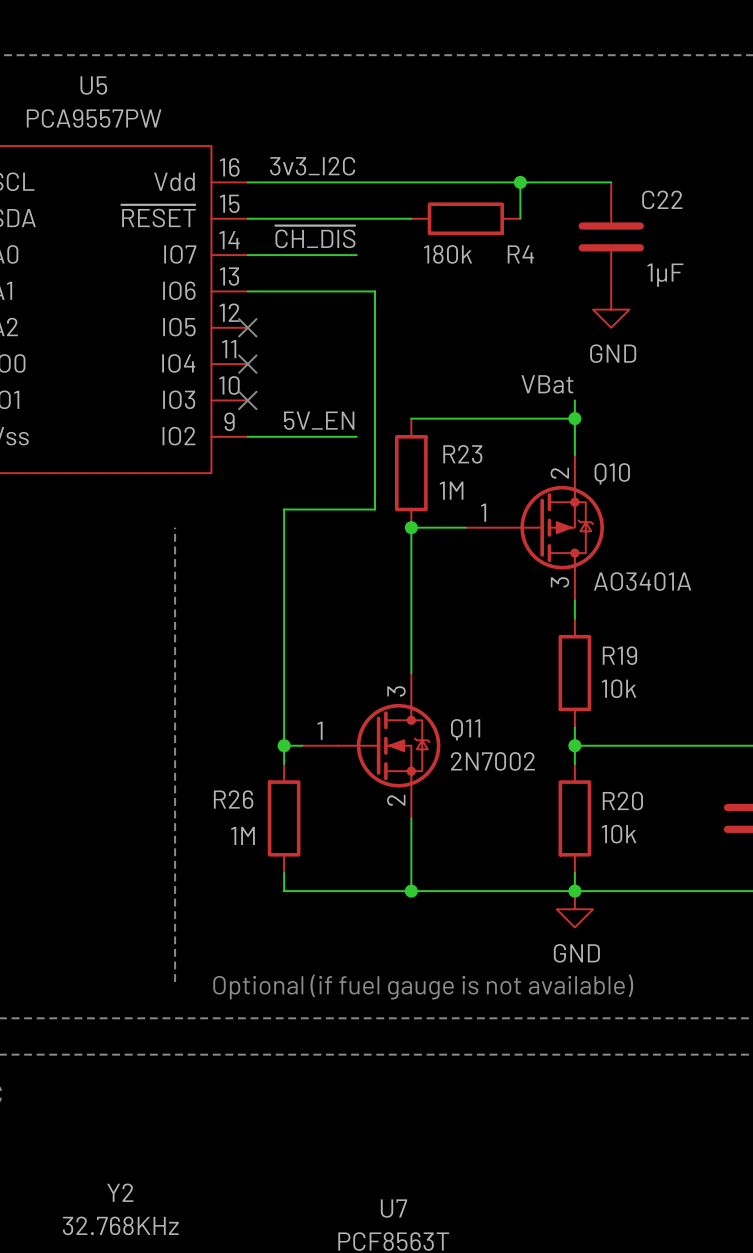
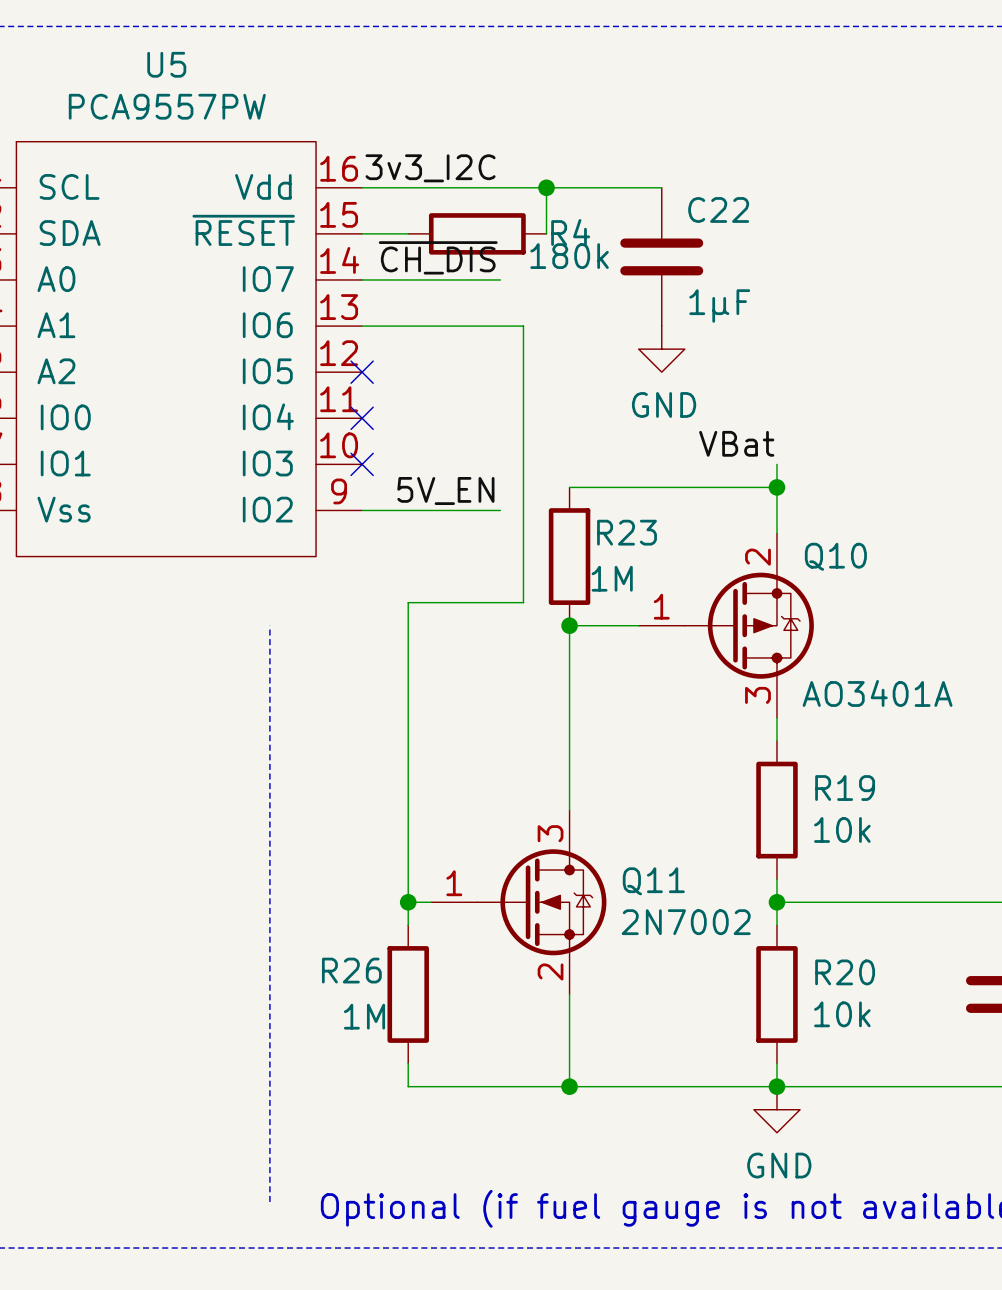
junction: none -> (546, 187)
wire: (484, 182) (611, 182) -> none
wire: (520, 182) (520, 218) -> (546, 187) (546, 233)
junction: (520, 182) -> none
wire: (284, 218) (411, 218) -> none
R4 position: (465, 218) -> (477, 233)
C22 position: (611, 236) -> (661, 256)
R4 value position: 180k (448, 254) -> 180k (569, 256)
R4 name position: R4 (520, 254) -> R4 (570, 232)
power symbol position: GND (611, 309) -> GND (661, 349)

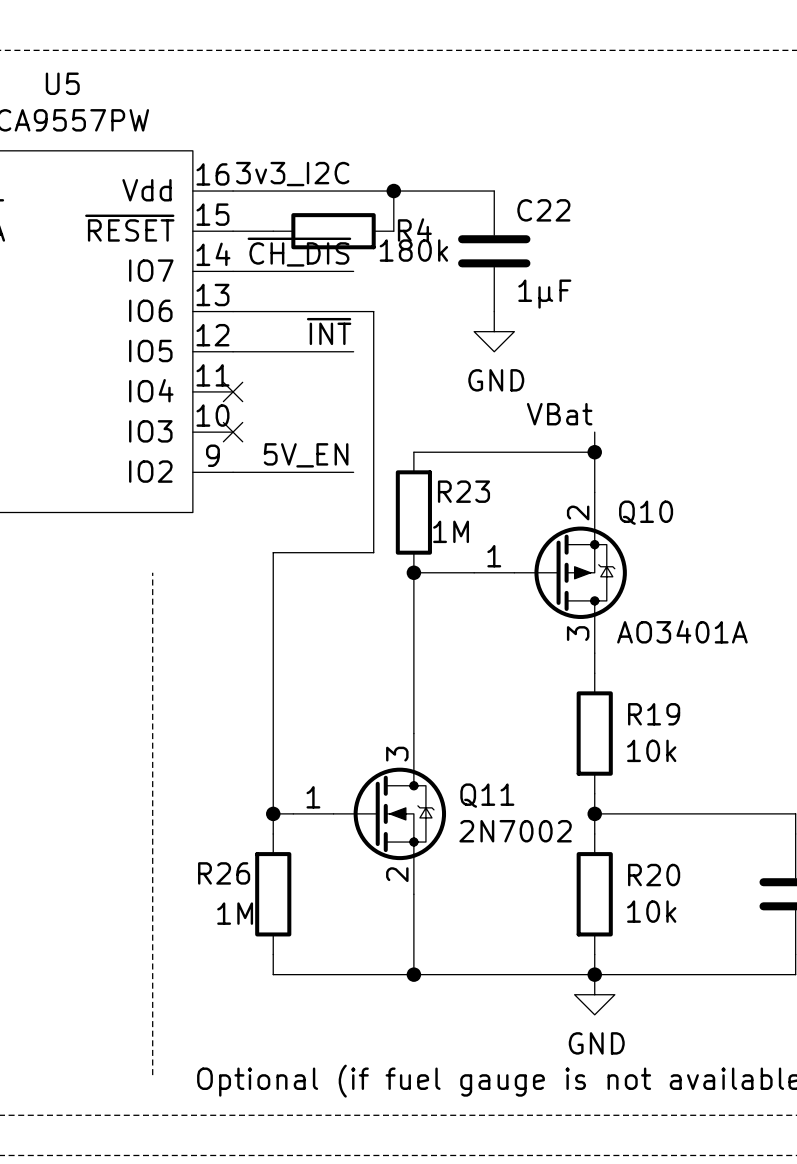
label: none -> ~{INT} (329, 331)
wire: none -> (233, 351) (353, 351)
no-connect mark: (362, 372) -> none

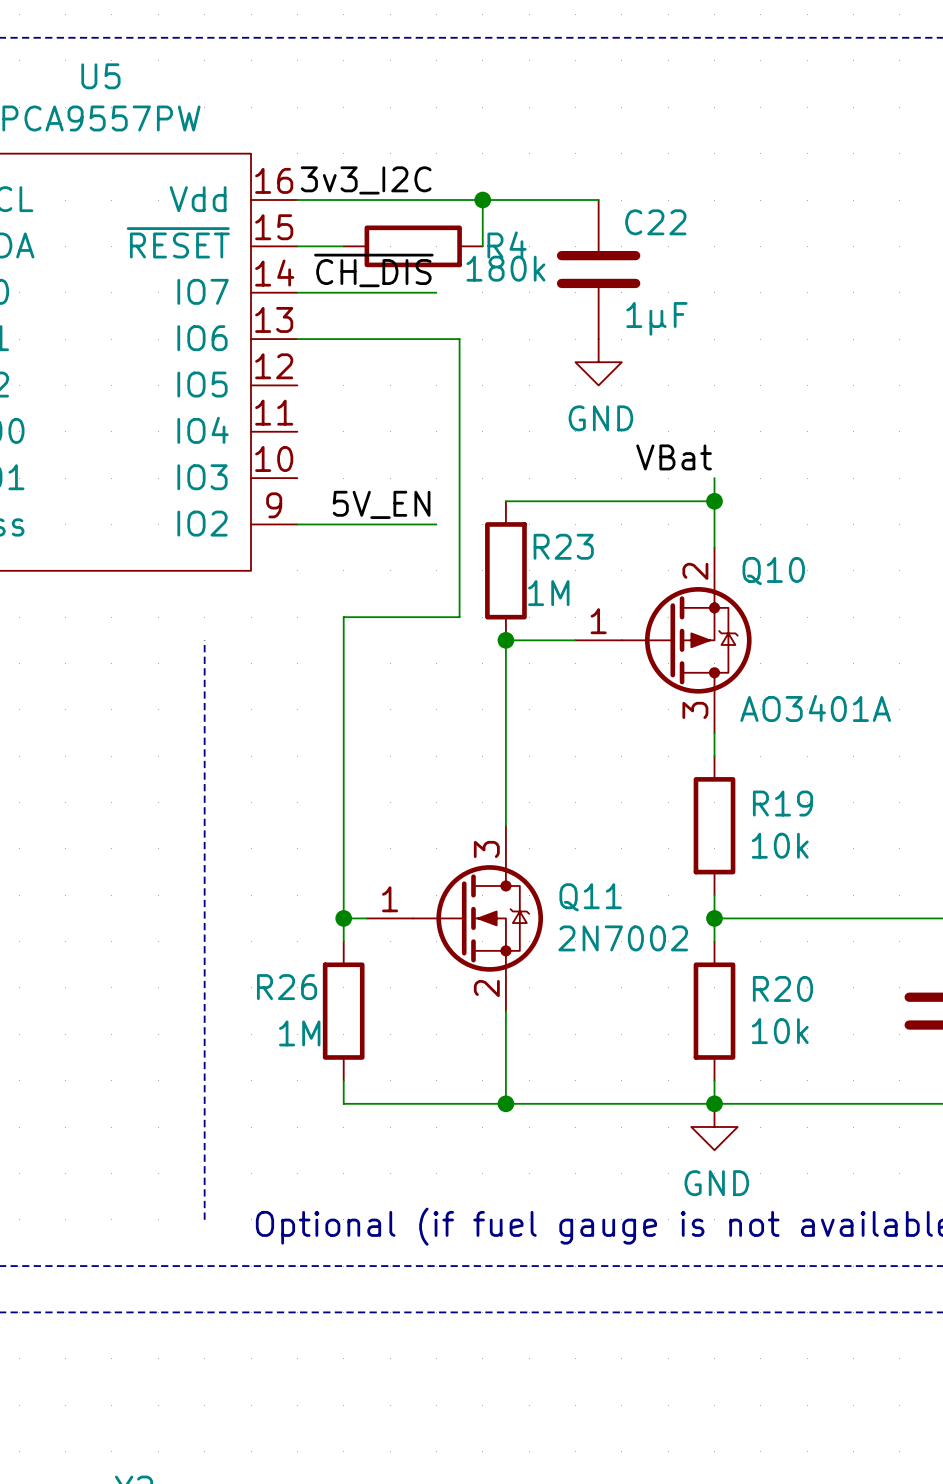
label: ~{INT} (329, 331) -> none
wire: (233, 351) (353, 351) -> none
no-connect mark: (233, 391) -> none
no-connect mark: (233, 432) -> none

